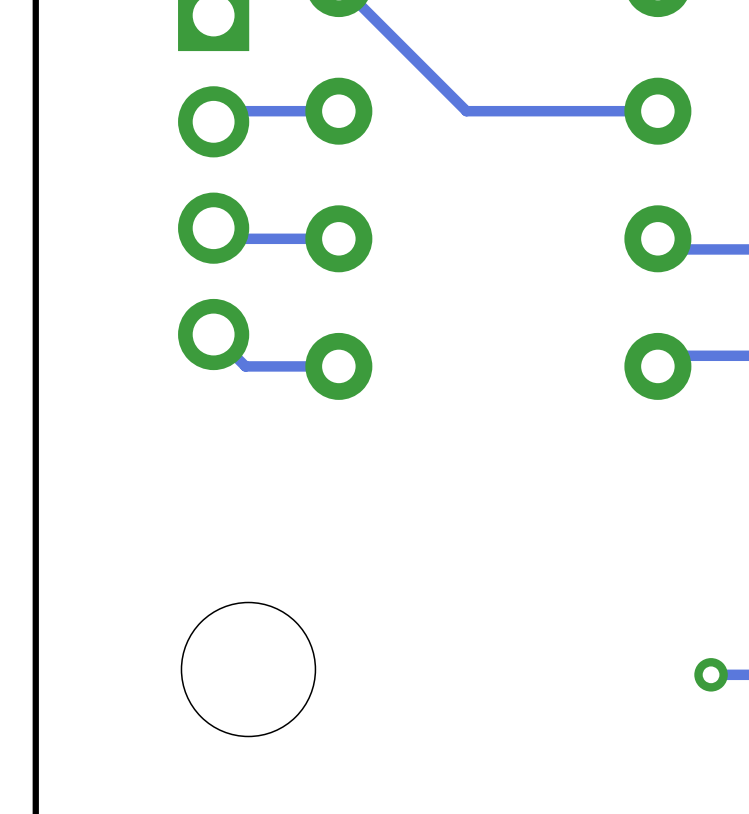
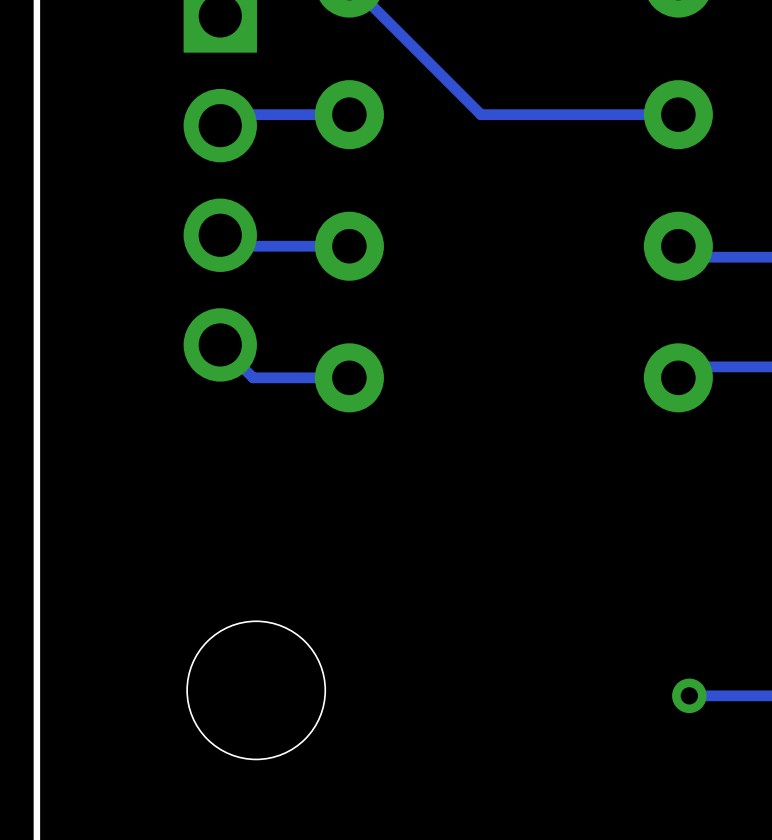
track: none -> (733, 695) (689, 695)
via position: (711, 674) -> (689, 695)

